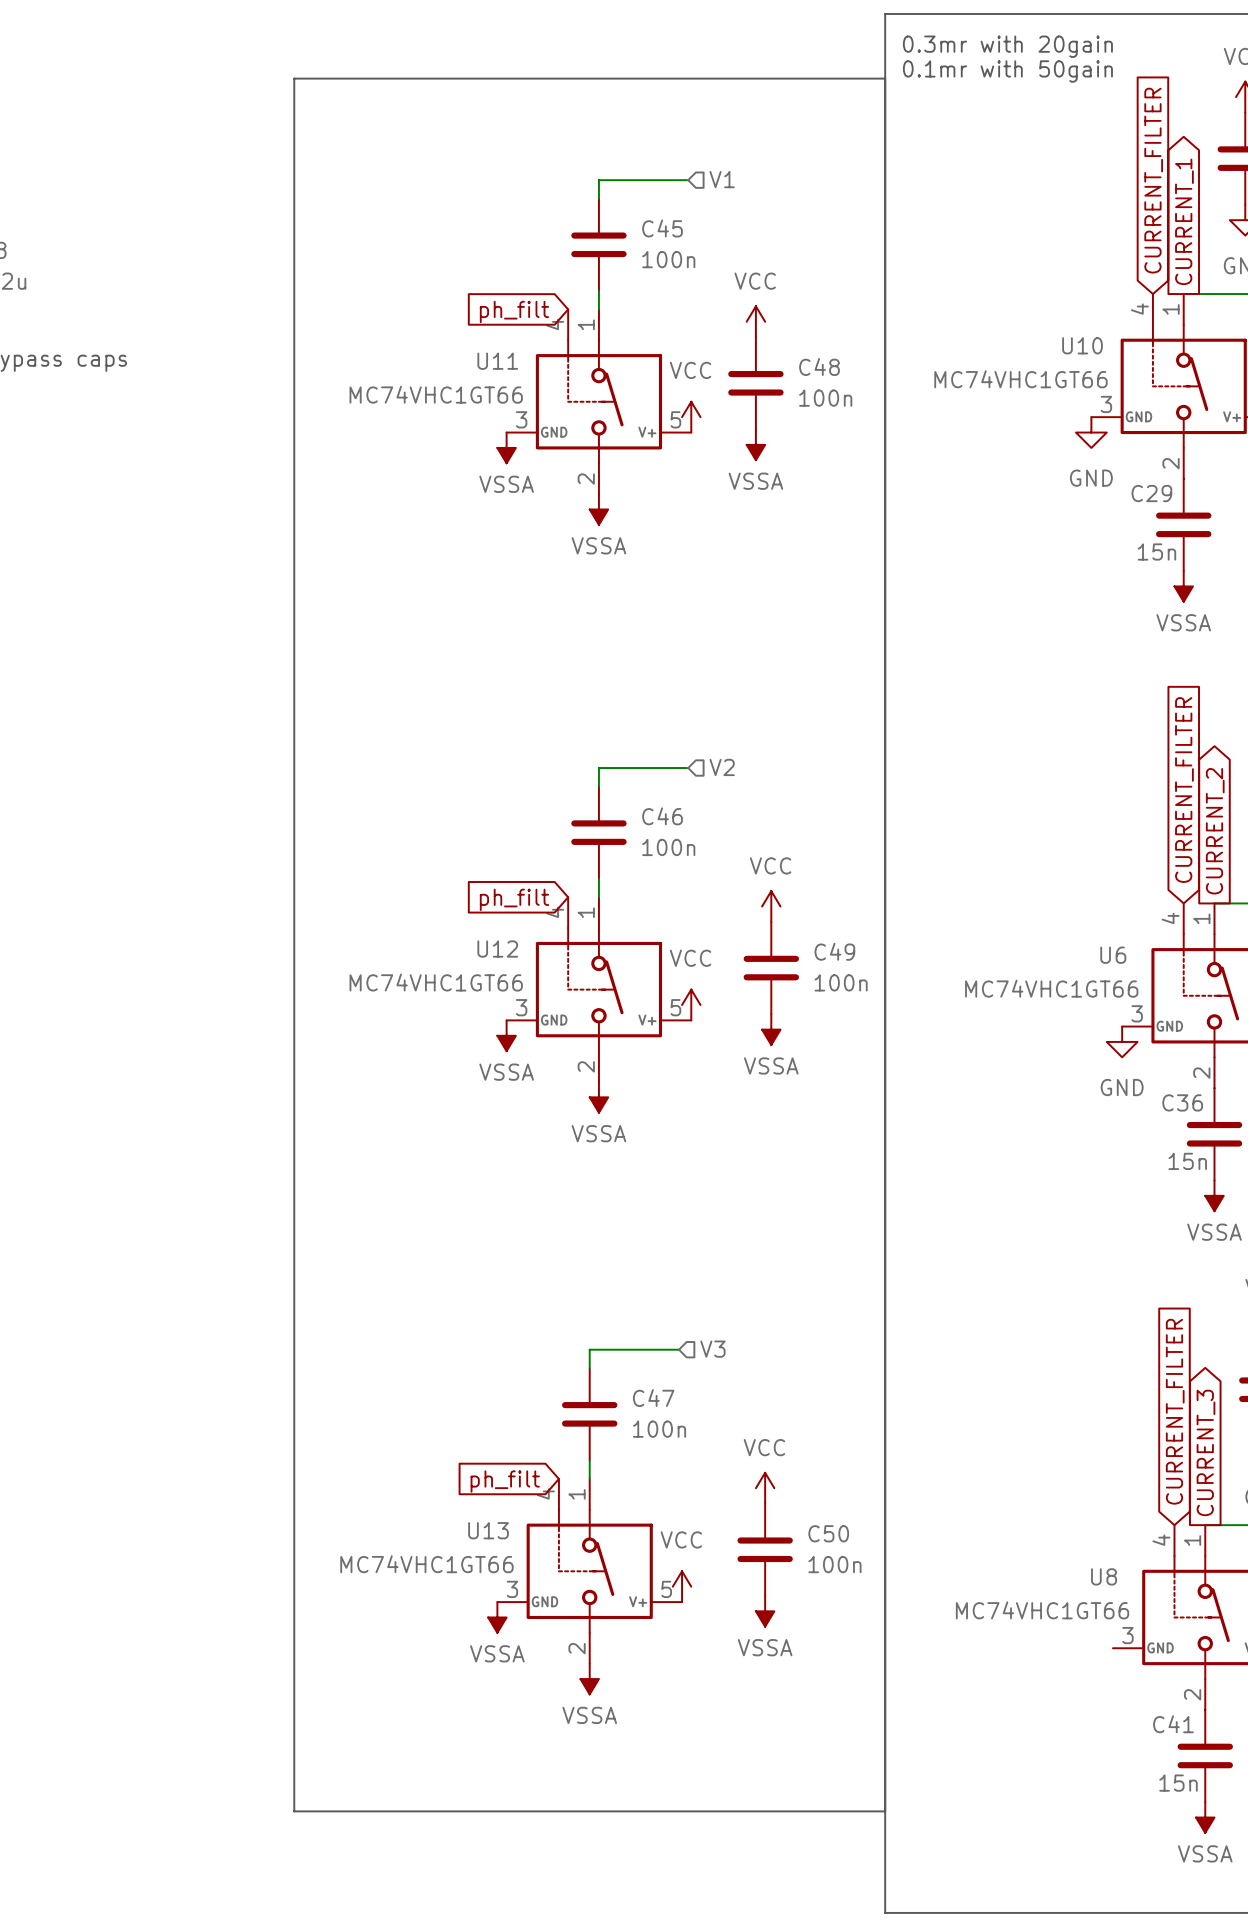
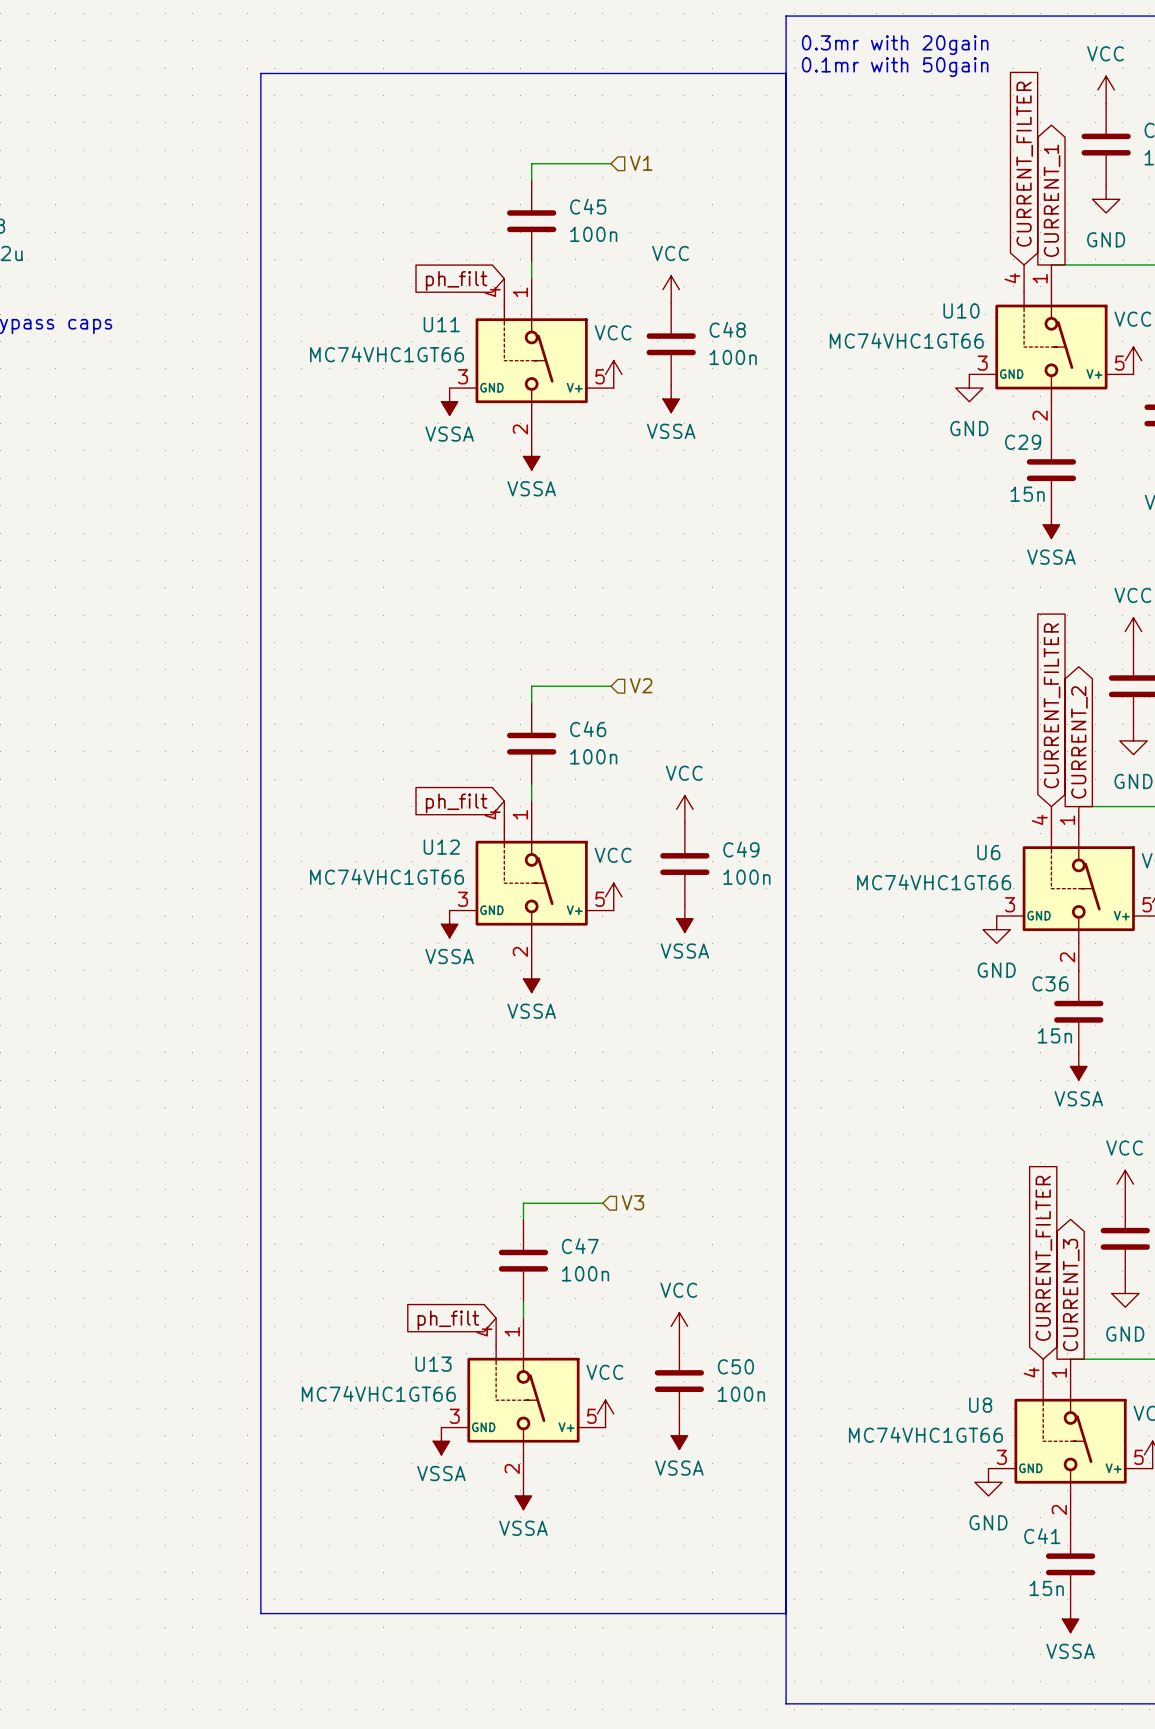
power symbol: none -> GND (988, 1482)

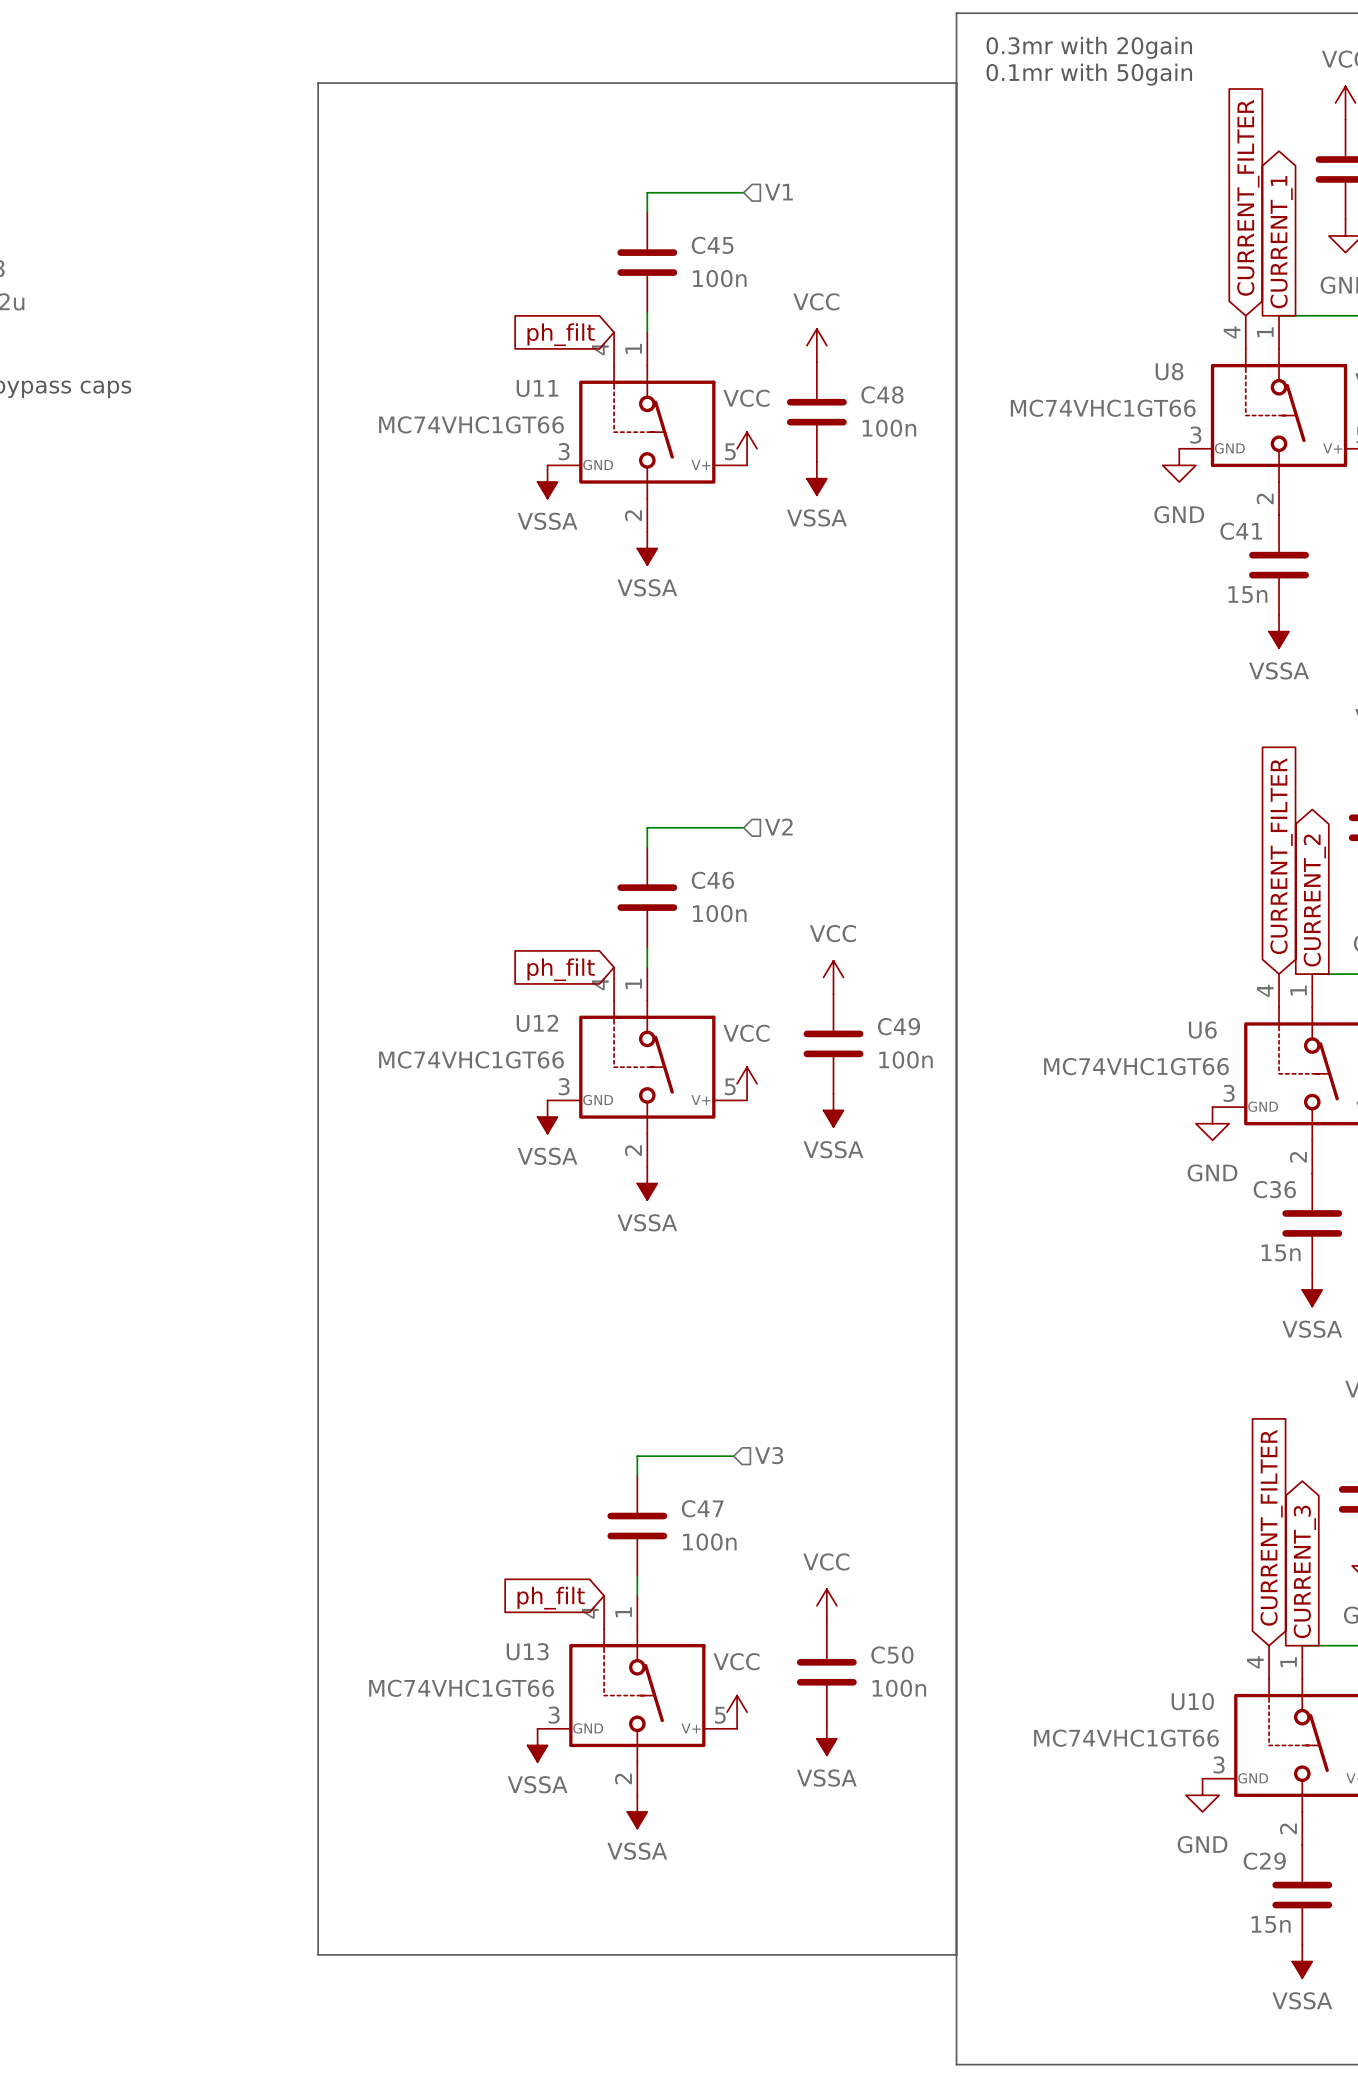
U10 name: U10 (961, 310) -> U8 (1169, 371)
C29 name: C29 (1023, 442) -> C41 (1241, 531)
U8 name: U8 (980, 1405) -> U10 (1192, 1701)
C41 name: C41 (1042, 1536) -> C29 (1264, 1861)

